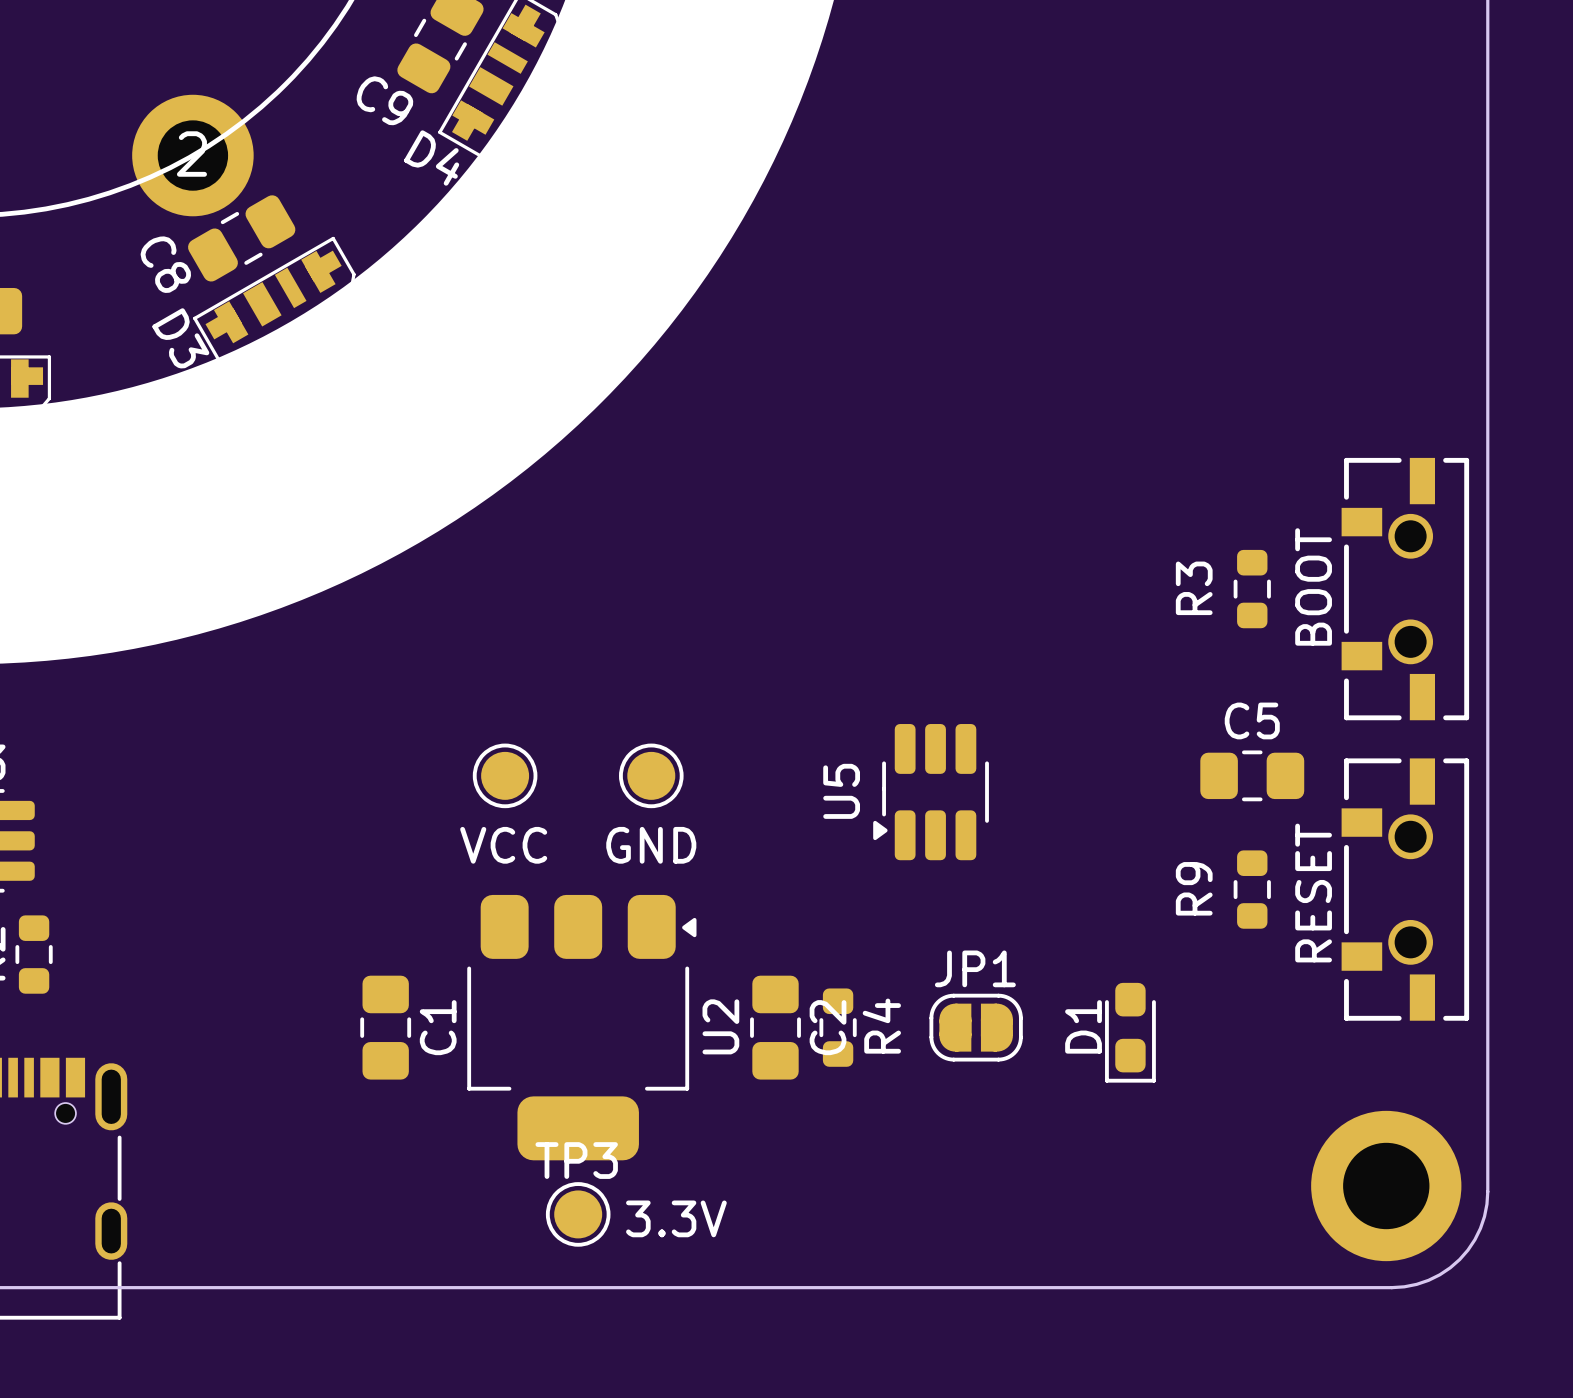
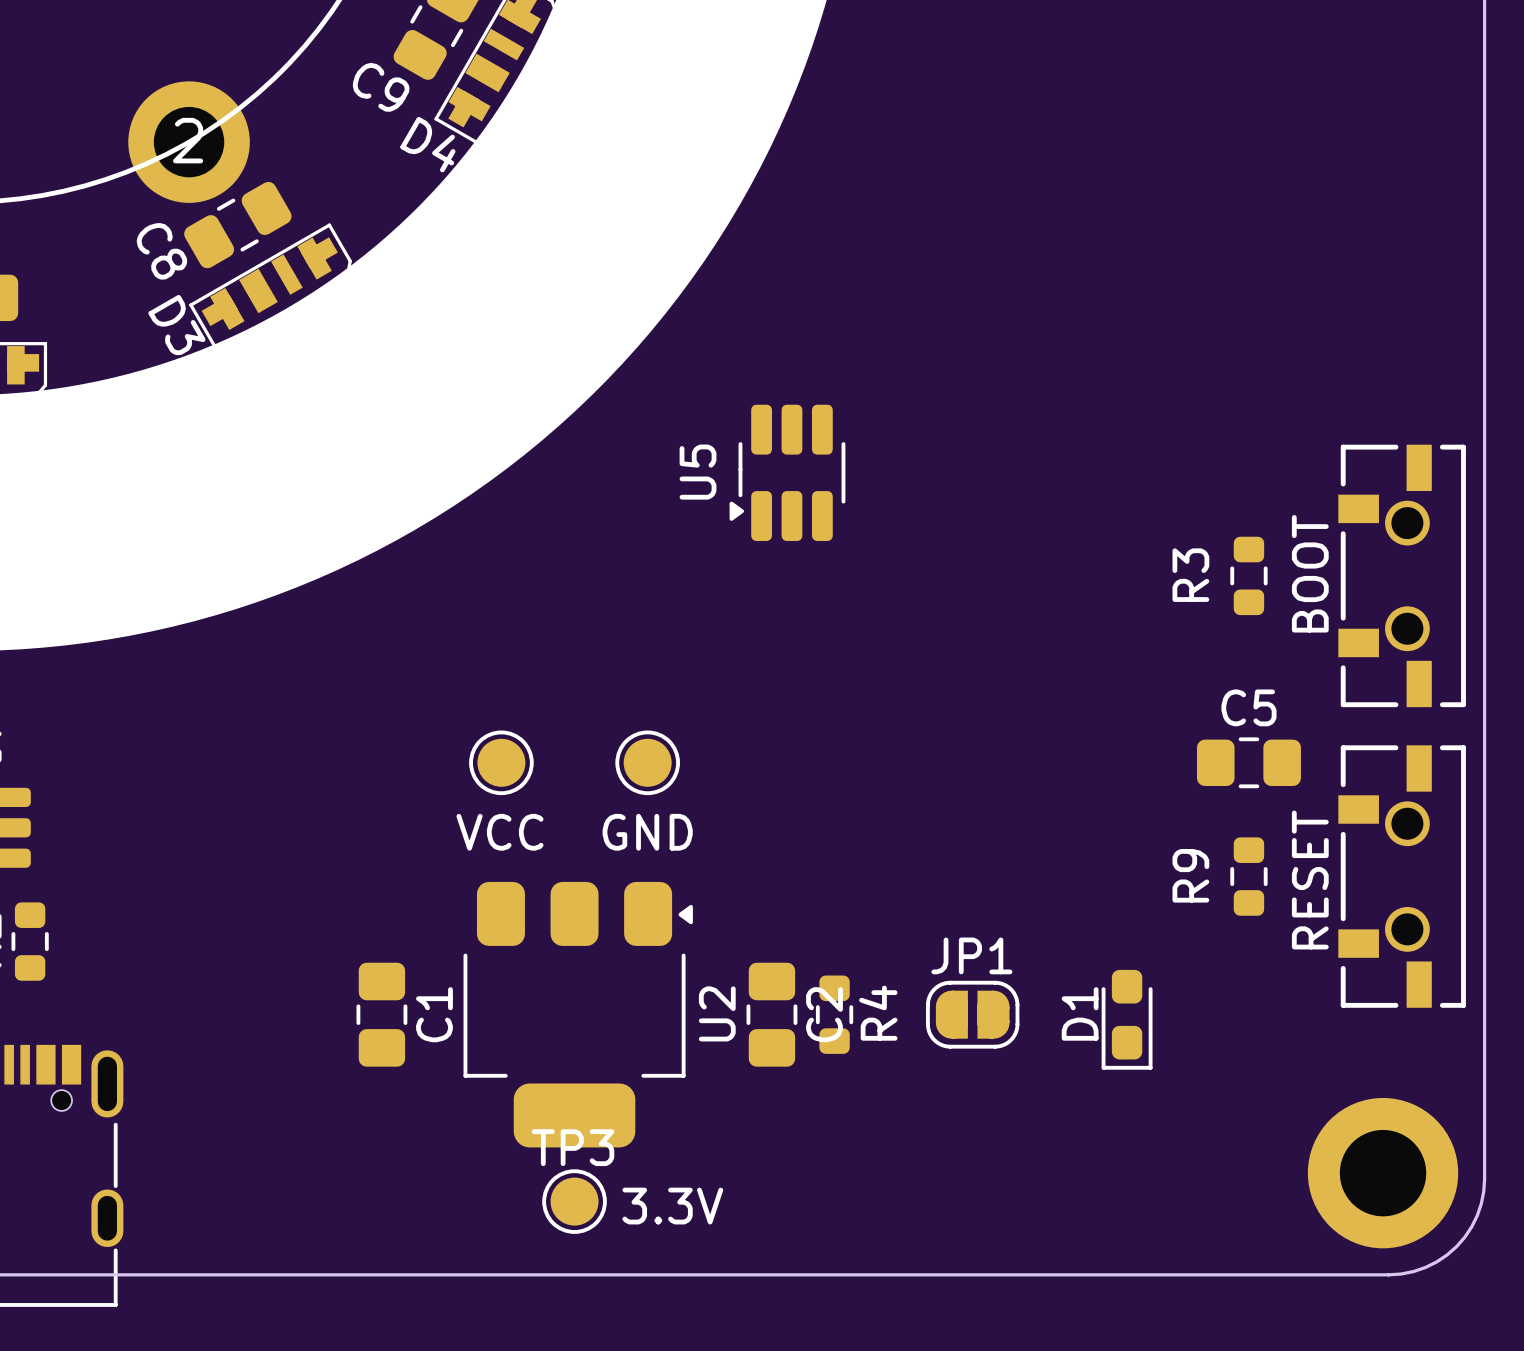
U5 position: (931, 792) -> (787, 472)

